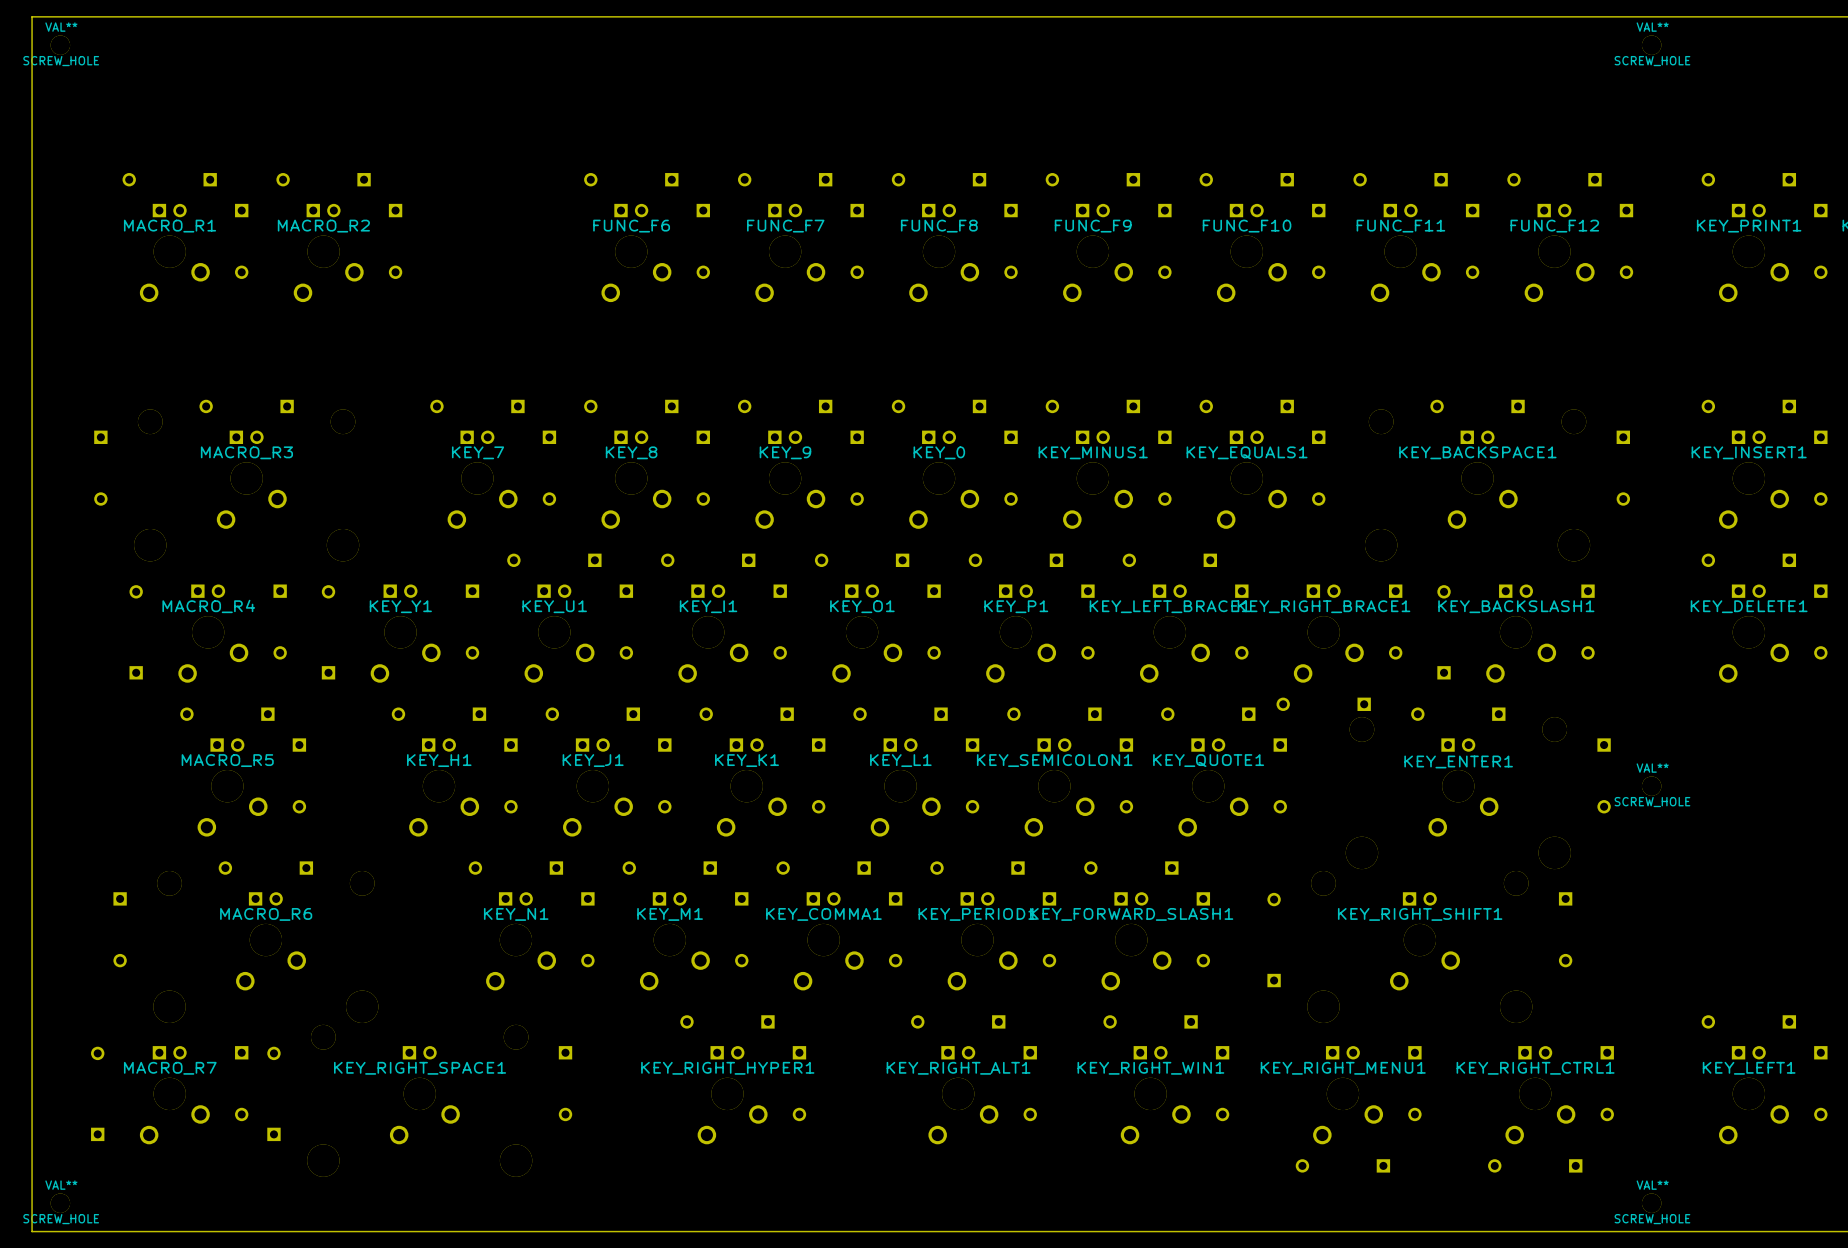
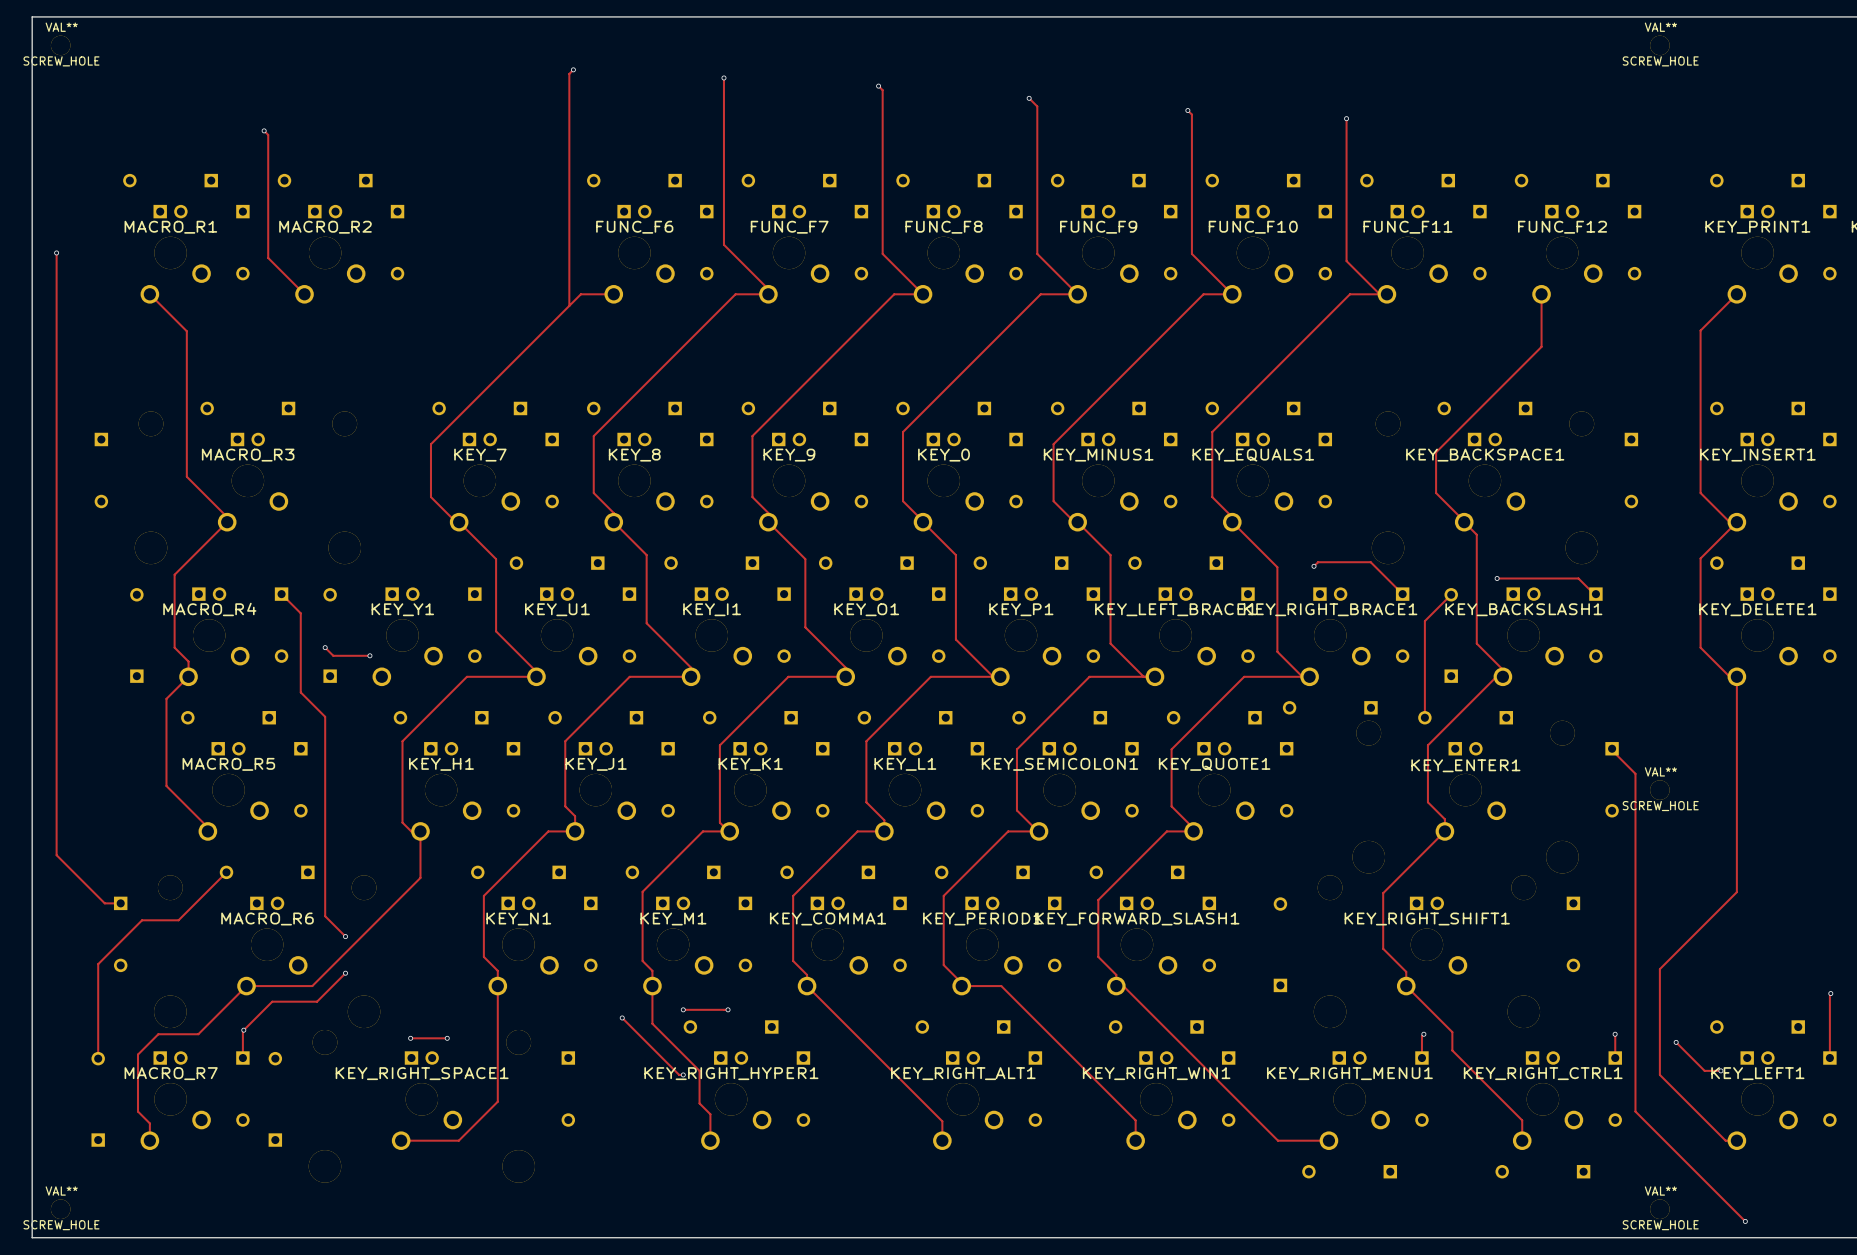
track: none -> (573, 69) (569, 73) (569, 305)
via: none -> (573, 69)
track: none -> (723, 77) (723, 244) (768, 289) (768, 294) (735, 294) (593, 436) (593, 493) (613, 513) (613, 522) (646, 555) (646, 623) (691, 667) (691, 676) (629, 676) (565, 741) (565, 806) (575, 816) (575, 831) (548, 831) (483, 895) (483, 956) (497, 970) (497, 1101) (458, 1140) (401, 1140)
via: none -> (723, 77)
track: none -> (878, 86) (882, 90) (882, 253) (923, 294) (894, 294) (752, 436) (752, 497) (768, 513) (768, 522) (805, 559) (805, 627) (845, 667) (845, 676) (788, 676) (719, 745) (719, 822) (728, 831)
via: none -> (878, 86)
track: none -> (1029, 98) (1037, 106) (1037, 253) (1077, 294) (1040, 294) (903, 432) (903, 501) (955, 555) (955, 639) (993, 676)
via: none -> (1029, 98)
track: none -> (1187, 110) (1191, 114) (1191, 253) (1232, 294) (1203, 294) (1053, 444) (1053, 501) (1110, 555) (1110, 643) (1143, 676)
via: none -> (1187, 110)
track: none -> (1346, 118) (1346, 261) (1379, 294)
via: none -> (1346, 118)
track: none -> (264, 130) (268, 134) (268, 258) (304, 294)
via: none -> (264, 130)
track: none -> (56, 252) (56, 855) (104, 903) (120, 903)
via: none -> (56, 252)
track: none -> (149, 294) (186, 331) (186, 476) (227, 517) (227, 522) (174, 574) (174, 647) (188, 661) (188, 676) (166, 698) (166, 786) (207, 827) (207, 831)
track: none -> (613, 294) (580, 294) (430, 444) (430, 497) (496, 559) (496, 631) (536, 671) (536, 676) (466, 676) (402, 741) (402, 822) (411, 831) (420, 831) (420, 877) (312, 986) (246, 986) (198, 1034) (158, 1034) (138, 1054) (138, 1111) (149, 1123) (149, 1140)
track: none -> (1386, 294) (1349, 294) (1212, 432) (1212, 497) (1232, 517) (1232, 522) (1277, 567) (1277, 651) (1302, 676)
track: none -> (1541, 294) (1541, 346) (1436, 452) (1436, 493) (1476, 534) (1476, 643) (1502, 669) (1502, 676) (1496, 676) (1427, 745) (1427, 802) (1444, 819) (1444, 831) (1383, 893) (1383, 948) (1406, 971) (1406, 986) (1452, 1032) (1452, 1050) (1522, 1120) (1522, 1140)
track: none -> (1736, 294) (1700, 330) (1700, 493) (1729, 522) (1736, 522) (1700, 558) (1700, 647) (1729, 676) (1736, 676) (1736, 892) (1659, 969) (1659, 1074) (1725, 1140) (1736, 1140)
track: none -> (1314, 566) (1318, 562) (1370, 562) (1402, 594)
via: none -> (1314, 566)
track: none -> (1497, 578) (1578, 578) (1595, 594)
via: none -> (1497, 578)
track: none -> (281, 594) (300, 613) (300, 692) (325, 716) (325, 916) (345, 936)
track: none -> (1451, 594) (1424, 621) (1424, 717)
track: none -> (325, 647) (333, 655) (369, 655)
via: none -> (325, 647)
via: none -> (369, 655)
track: none -> (1000, 676) (930, 676) (866, 741) (866, 802) (884, 820) (884, 831) (857, 831) (793, 895) (793, 961) (807, 974) (807, 986) (942, 1121) (942, 1140)
track: none -> (1154, 676) (1089, 676) (1016, 749) (1016, 810) (1037, 831)
track: none -> (1309, 676) (1244, 676) (1171, 749) (1171, 806) (1193, 828) (1193, 831) (1166, 831) (1098, 899) (1098, 956) (1116, 974) (1116, 986) (1123, 986) (1278, 1140) (1328, 1140)
track: none -> (1612, 748) (1635, 773) (1635, 1111) (1745, 1221)
track: none -> (729, 831) (702, 831) (642, 891) (642, 961) (652, 970) (652, 1023) (699, 1070) (699, 1103) (710, 1114) (710, 1140)
track: none -> (1039, 831) (1008, 831) (943, 895) (943, 965) (961, 983) (961, 986) (1001, 986) (1135, 1120) (1135, 1140)
track: none -> (226, 872) (178, 920) (142, 920) (98, 964) (98, 1058)
via: none -> (345, 936)
track: none -> (345, 973) (317, 1001) (272, 1001) (242, 1031) (242, 1058)
via: none -> (345, 973)
track: none -> (1830, 993) (1829, 1058)
via: none -> (1830, 993)
track: none -> (683, 1009) (728, 1009)
via: none -> (683, 1009)
via: none -> (728, 1009)
track: none -> (622, 1017) (679, 1074) (683, 1074)
via: none -> (622, 1017)
via: none -> (243, 1030)
track: none -> (1423, 1034) (1421, 1036) (1421, 1058)
via: none -> (1423, 1034)
track: none -> (1615, 1034) (1615, 1058)
via: none -> (1615, 1034)
track: none -> (410, 1038) (447, 1038)
via: none -> (410, 1038)
via: none -> (447, 1038)
track: none -> (1676, 1042) (1704, 1070) (1720, 1070)
via: none -> (1676, 1042)
via: none -> (1720, 1070)
via: none -> (683, 1074)
via: none -> (1745, 1221)

